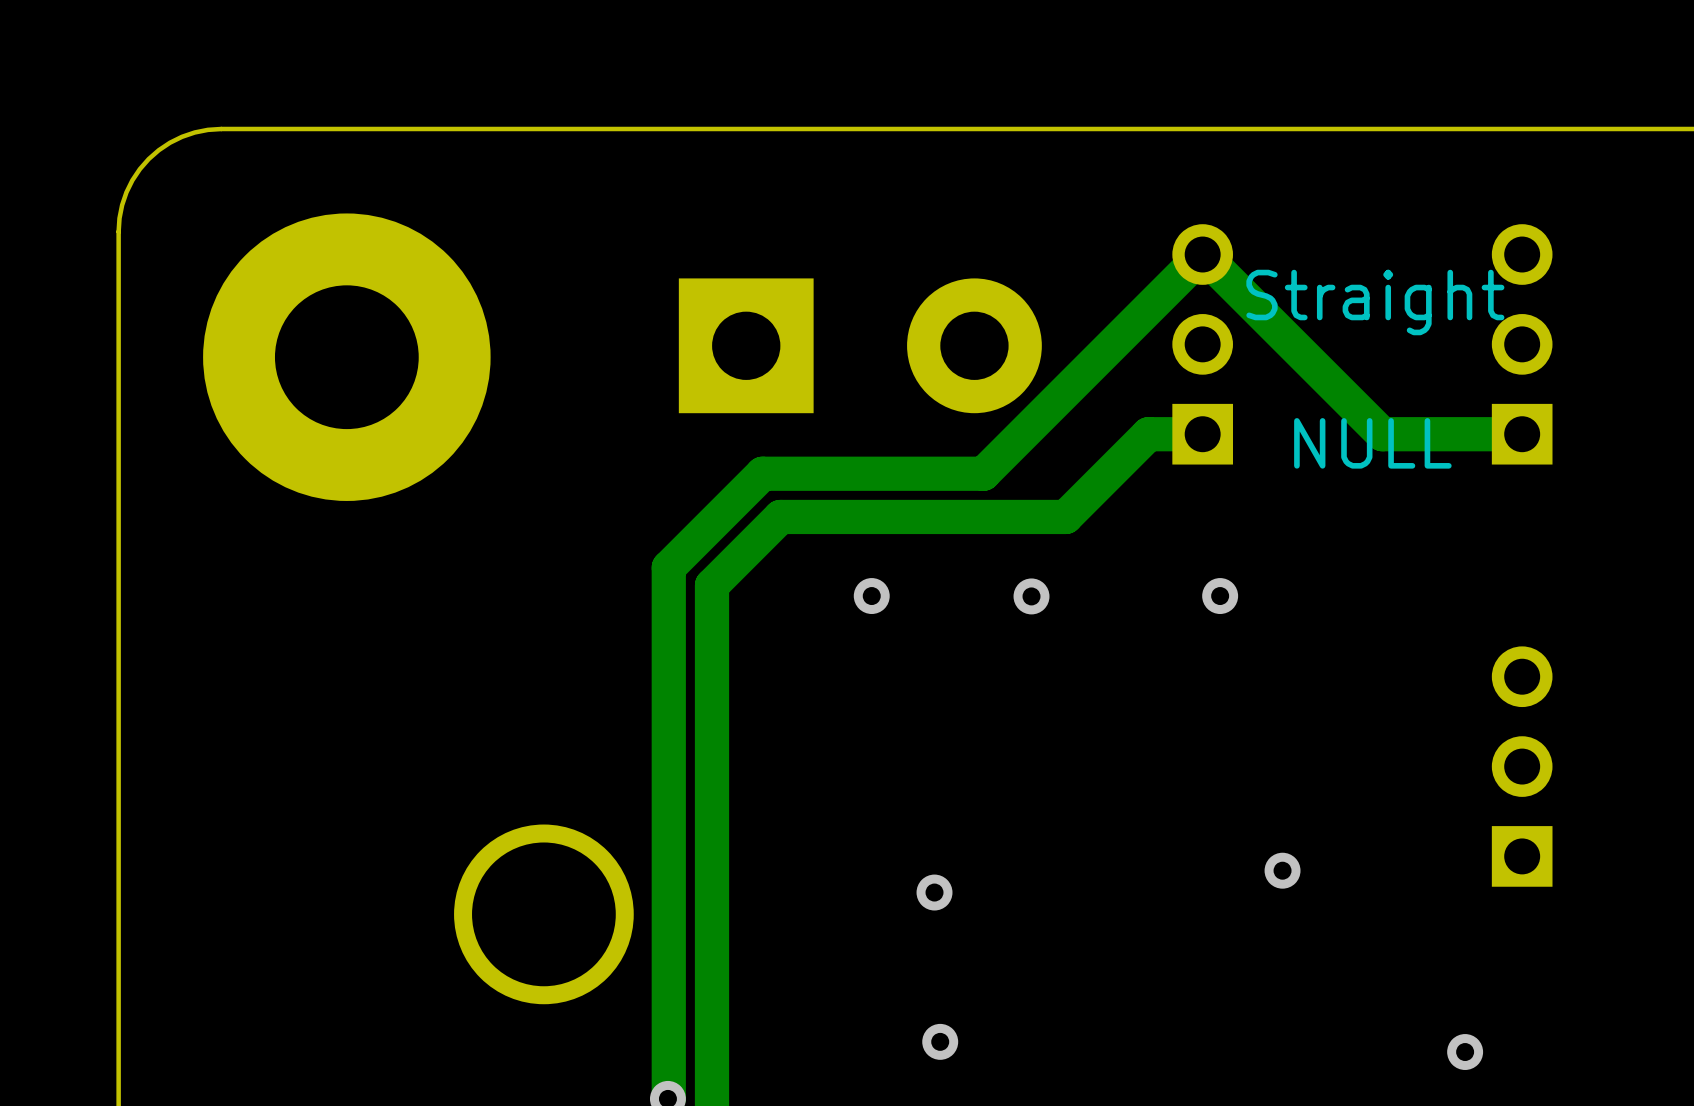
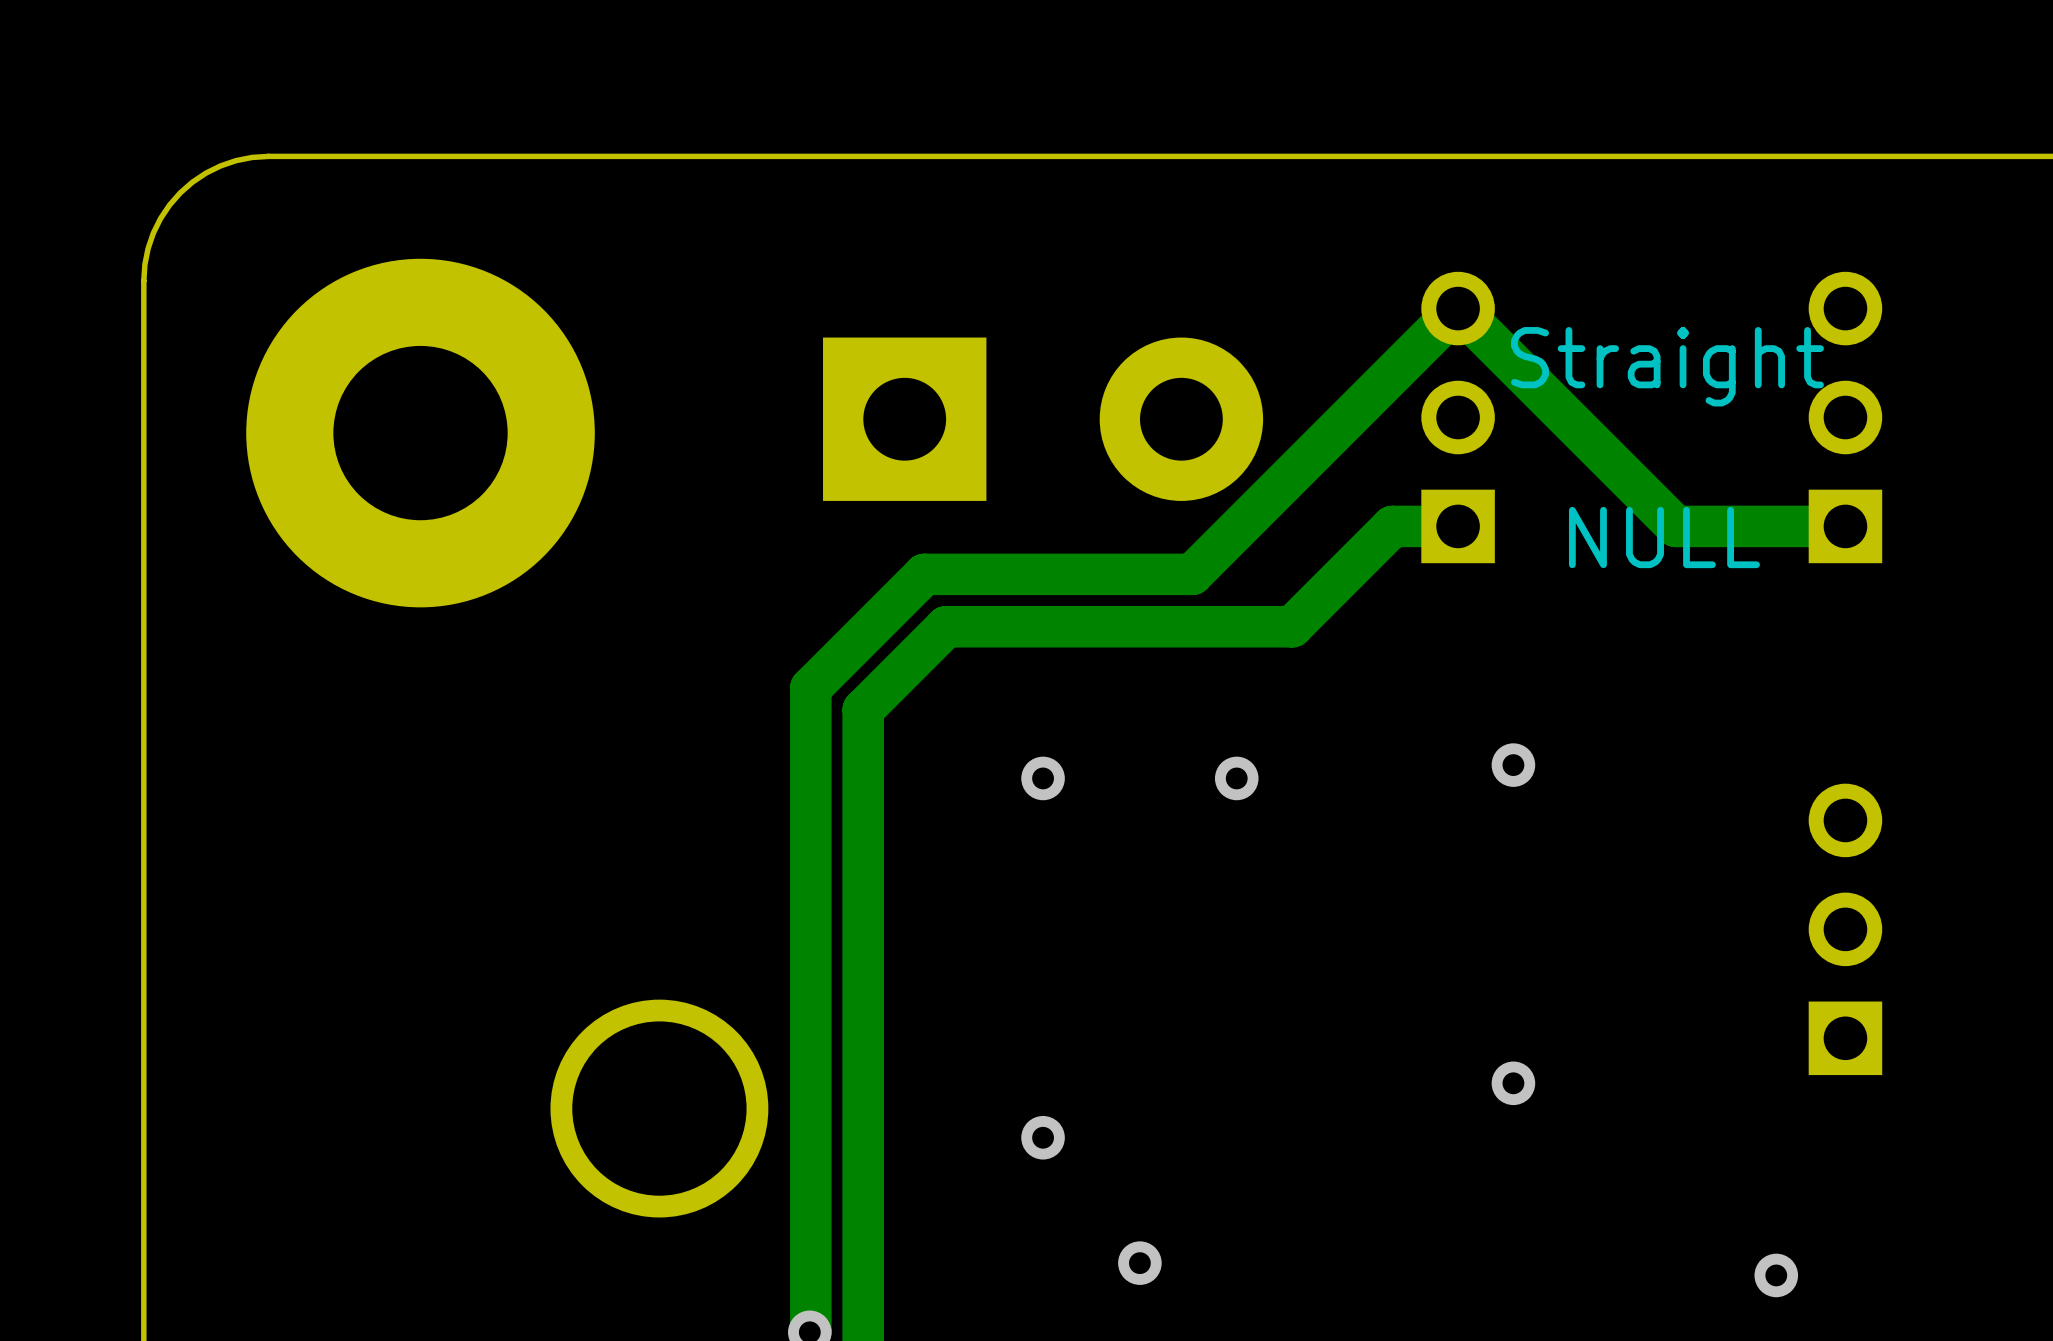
via position: (871, 596) -> (1043, 778)
via position: (1031, 596) -> (1236, 778)
via position: (1220, 596) -> (1513, 765)
via position: (1282, 870) -> (1513, 1083)
via position: (934, 892) -> (1043, 1137)

